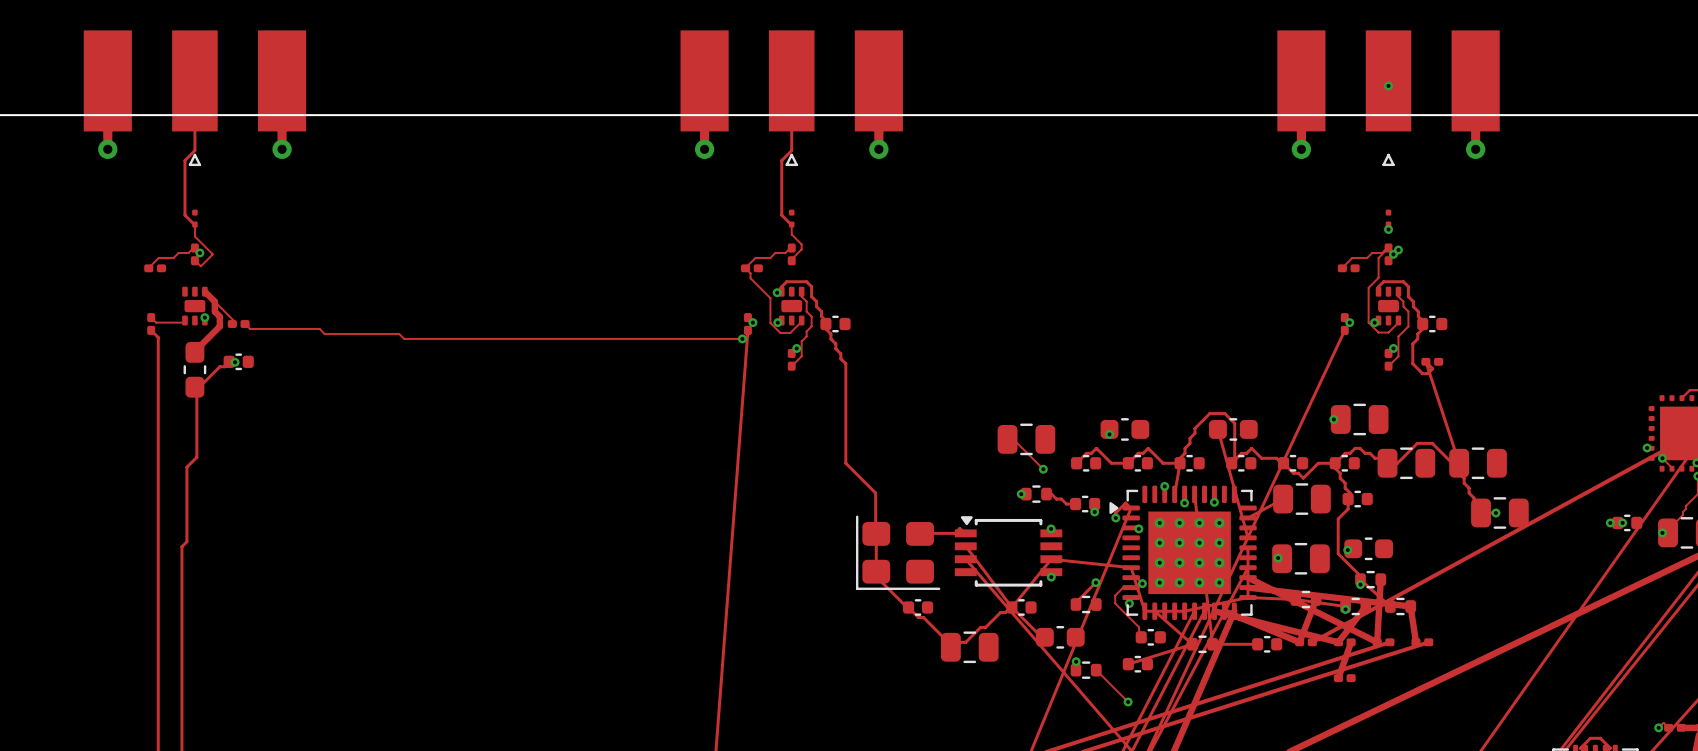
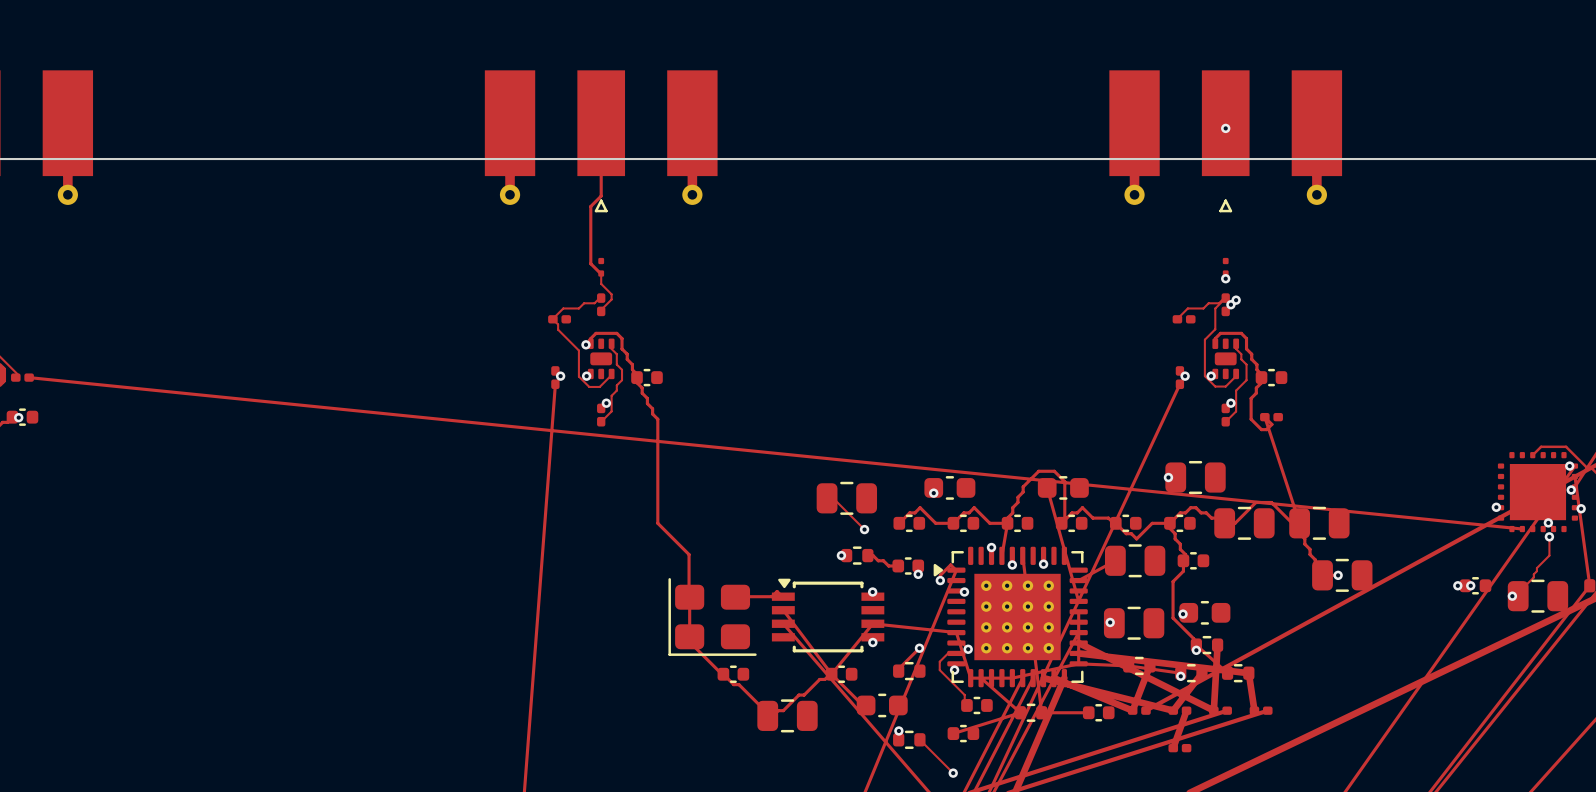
track: (245, 324) (250, 328) (319, 328) (324, 333) (399, 333) (404, 338) (742, 338) -> (29, 377) (1522, 529)
via: (742, 338) -> none
track: (1662, 458) (1672, 468) -> none
via: (1662, 458) -> none

